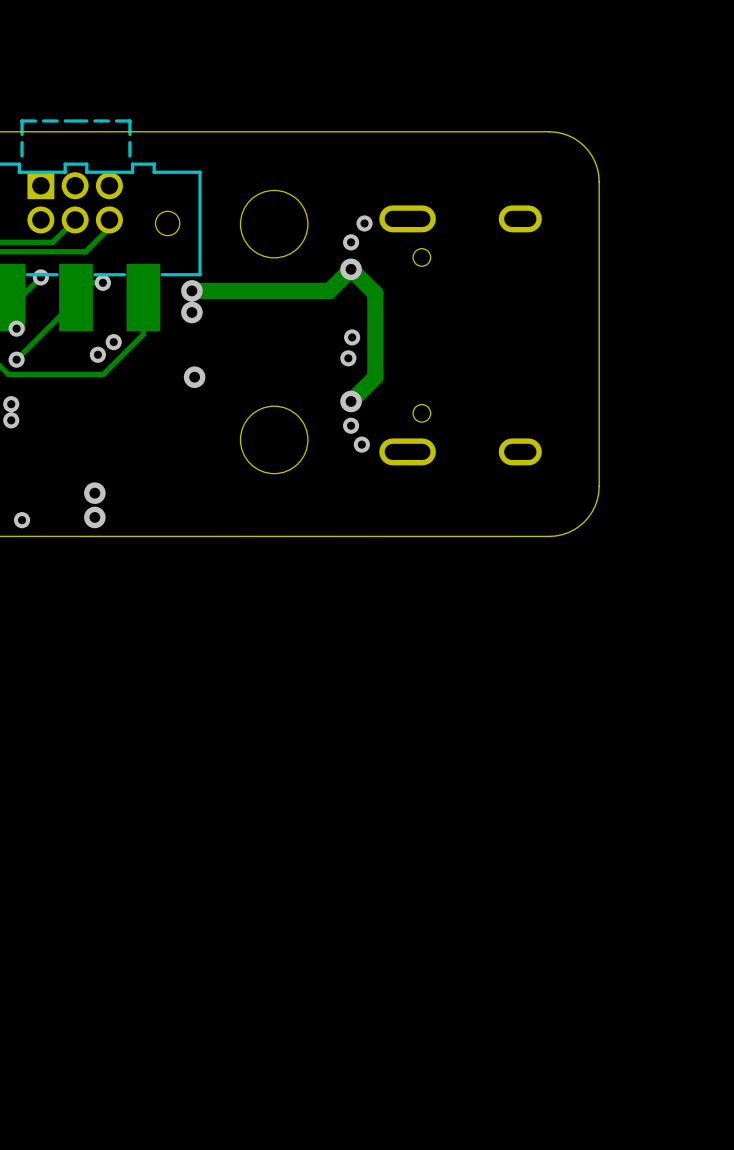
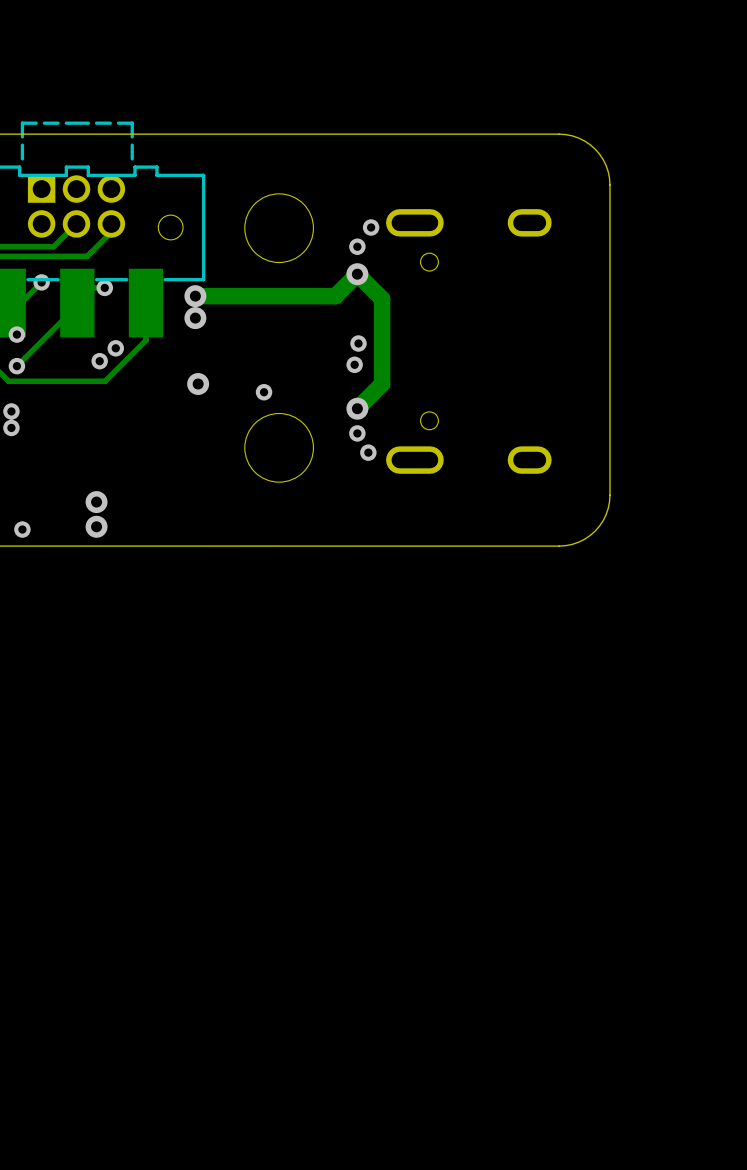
via: none -> (264, 392)

